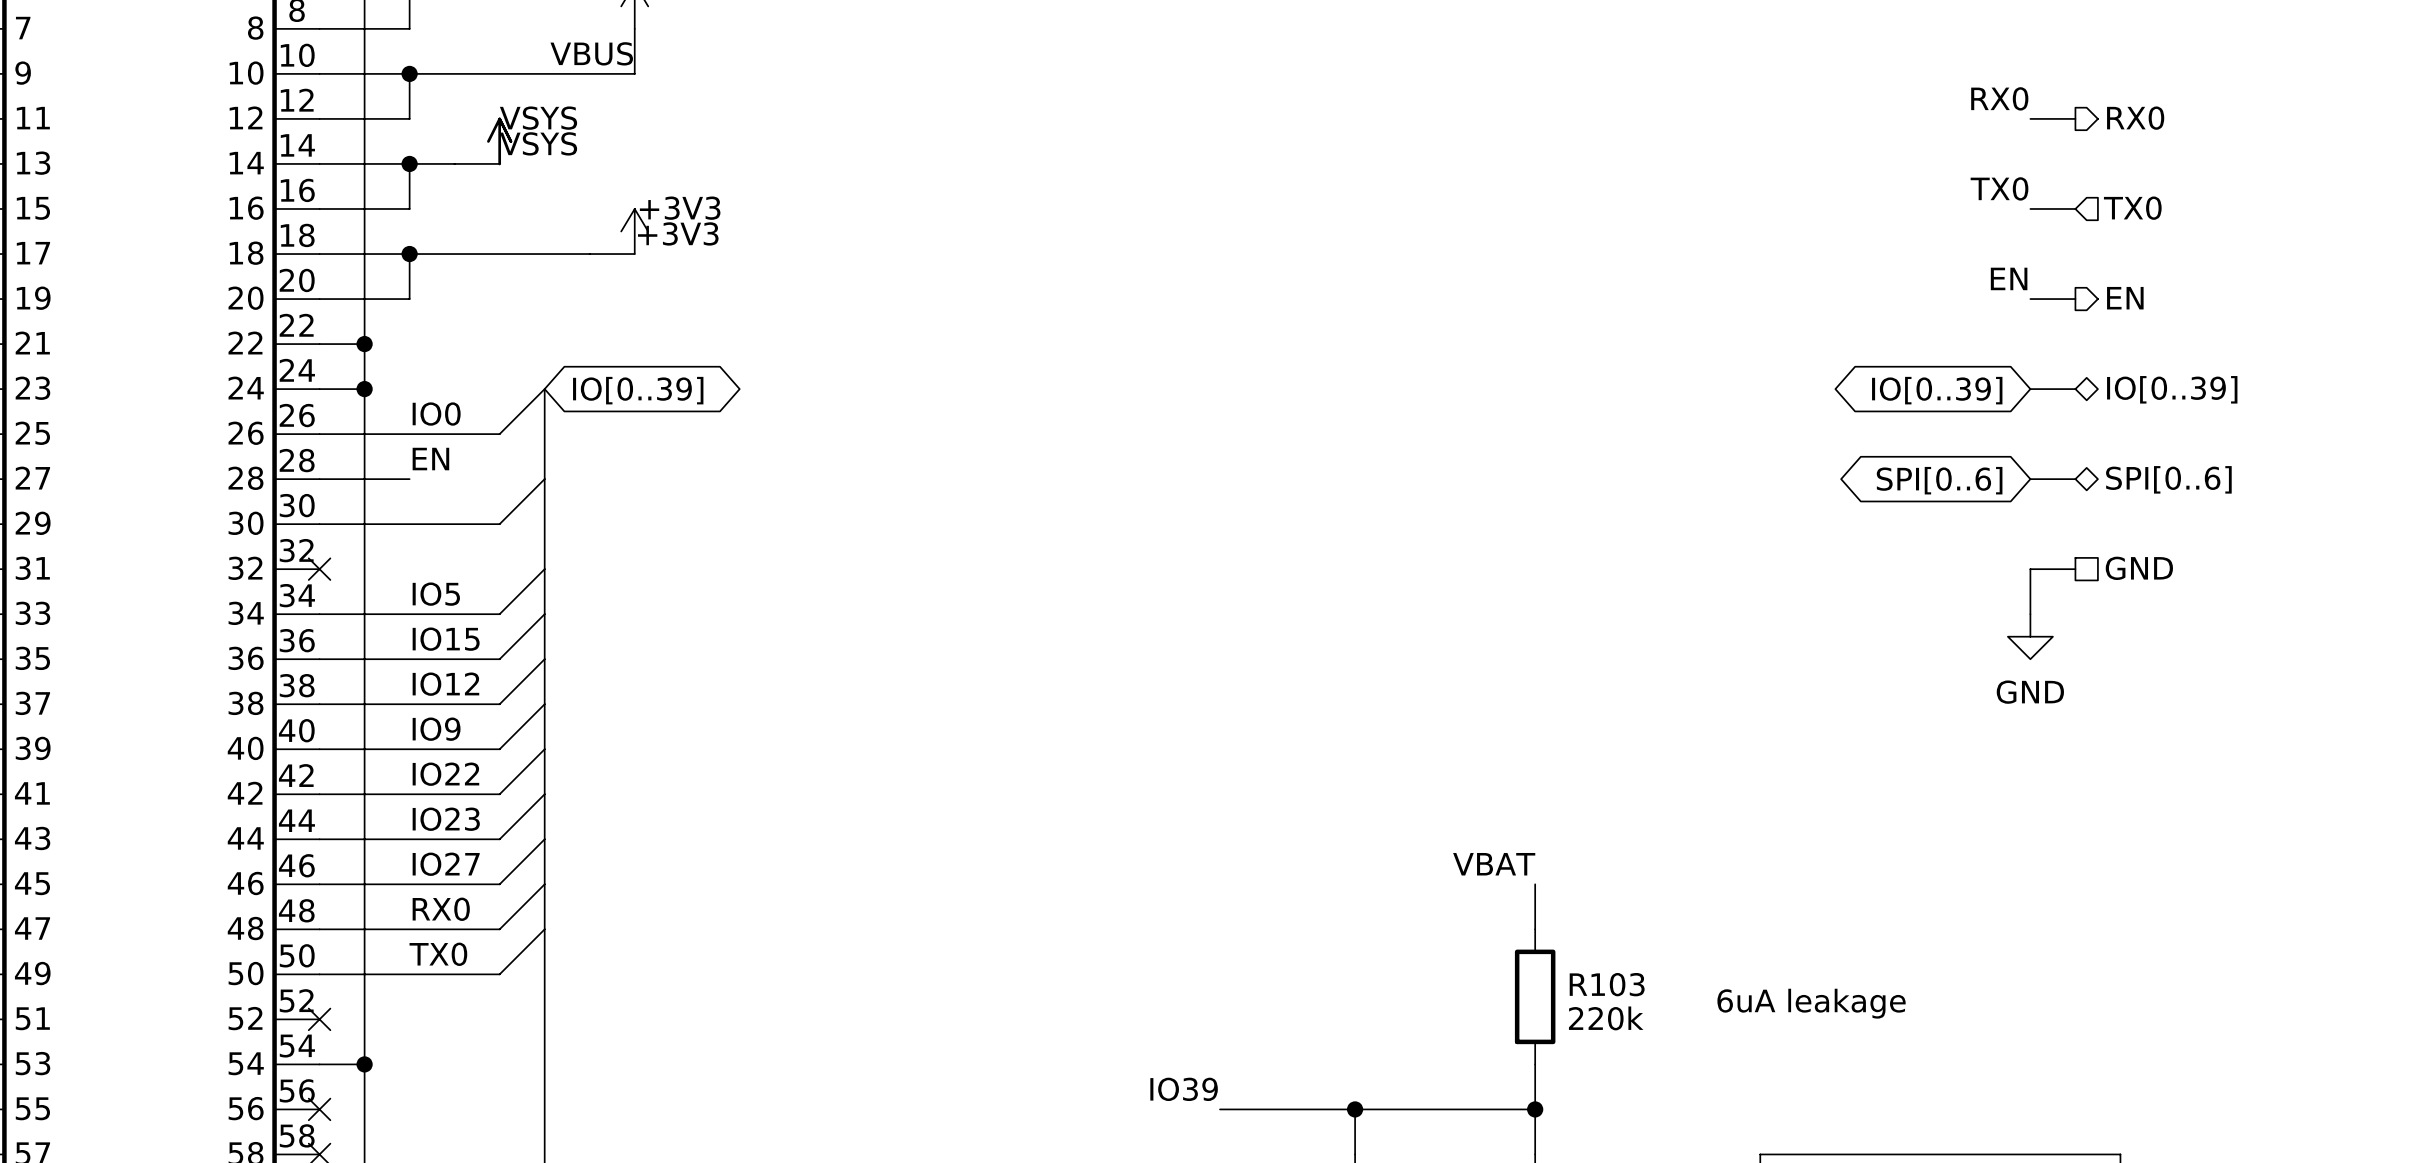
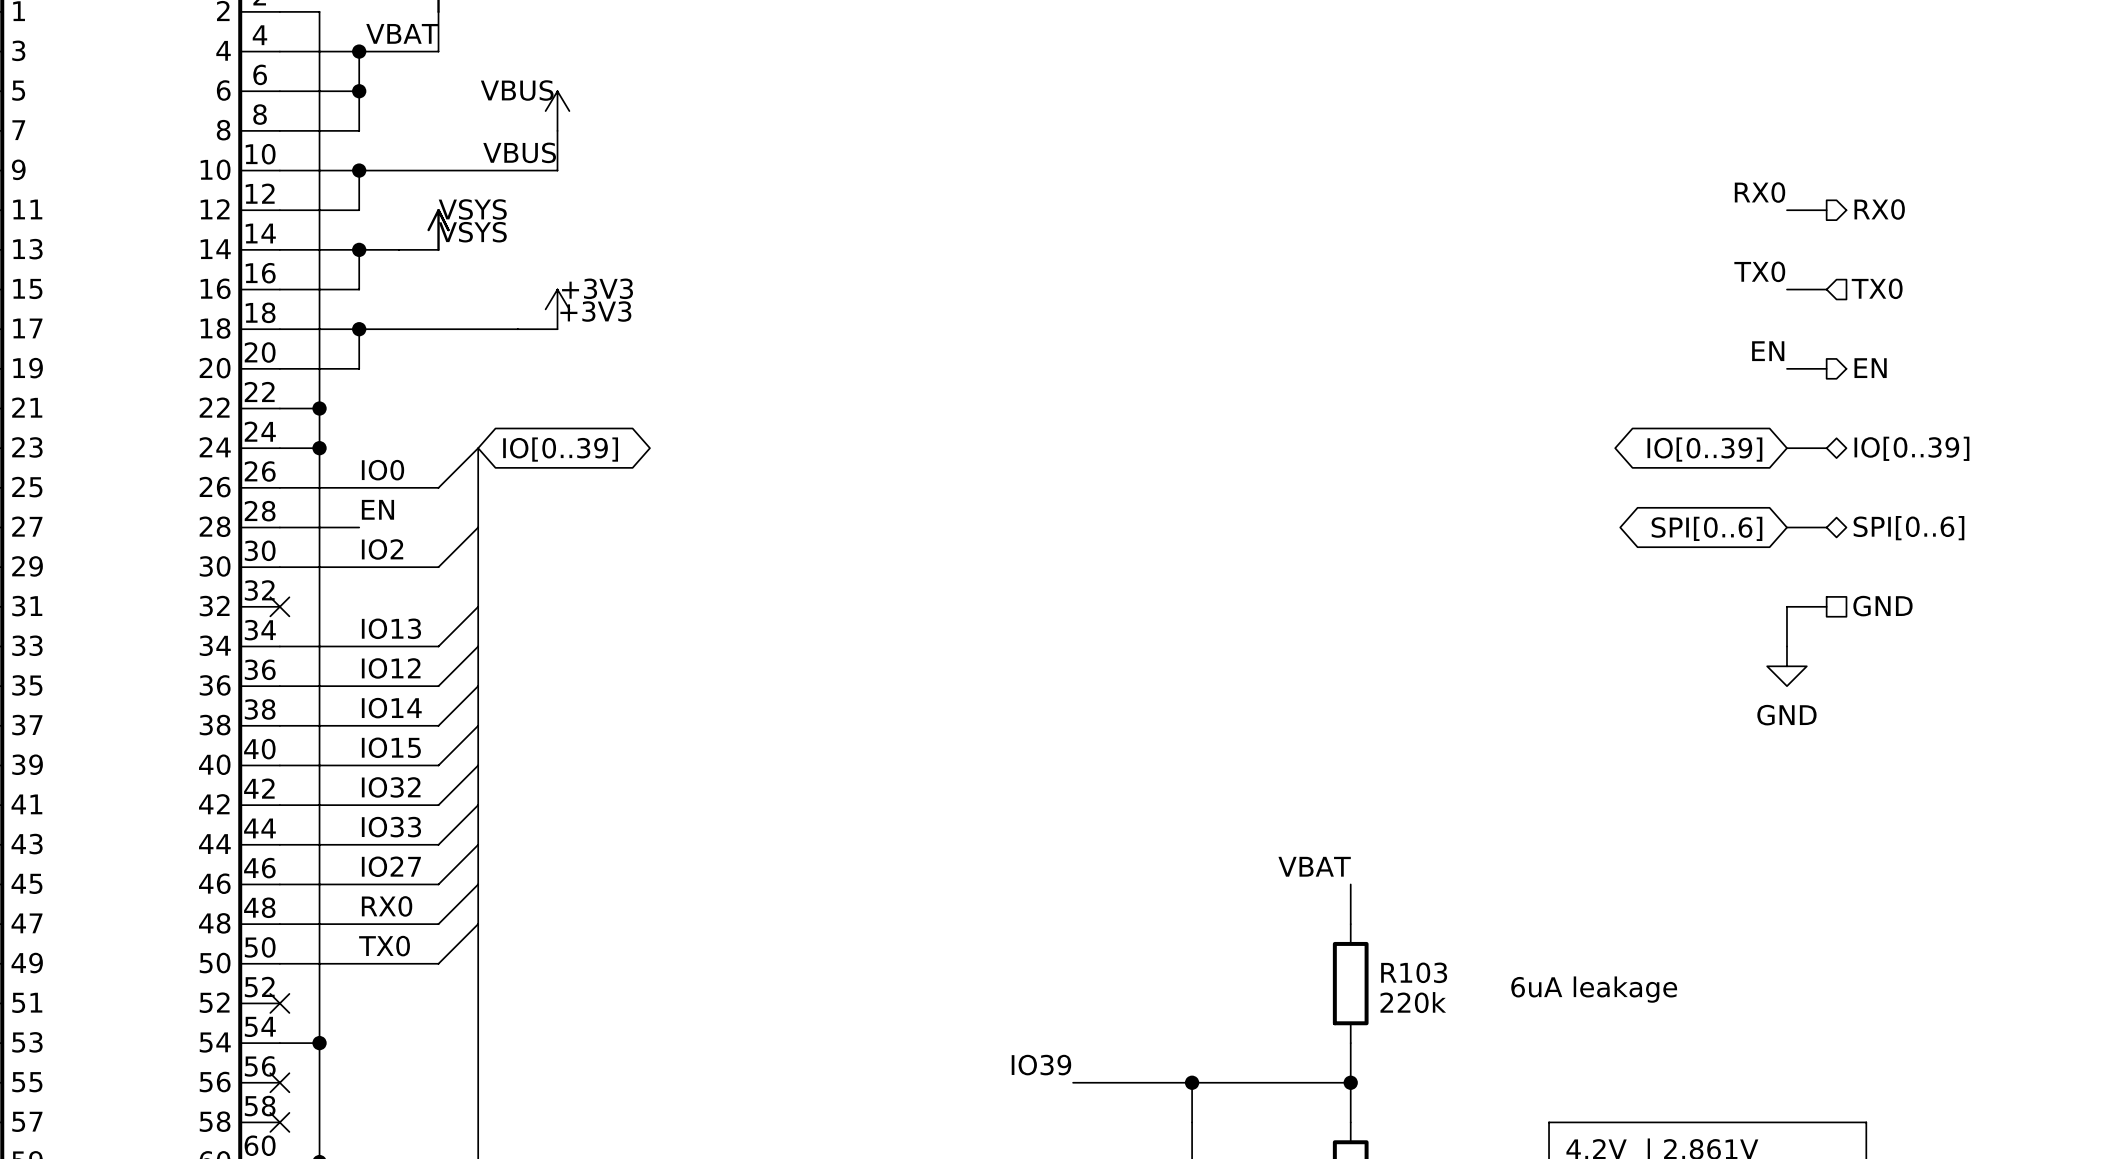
label: none -> IO2 (382, 549)
label: IO5 (436, 594) -> IO13 (391, 628)
label: IO15 (446, 639) -> IO12 (391, 668)
label: IO12 (445, 684) -> IO14 (391, 708)
label: IO9 (436, 729) -> IO15 (391, 747)
label: IO22 (445, 774) -> IO32 (391, 787)
label: IO23 (446, 819) -> IO33 (391, 827)

